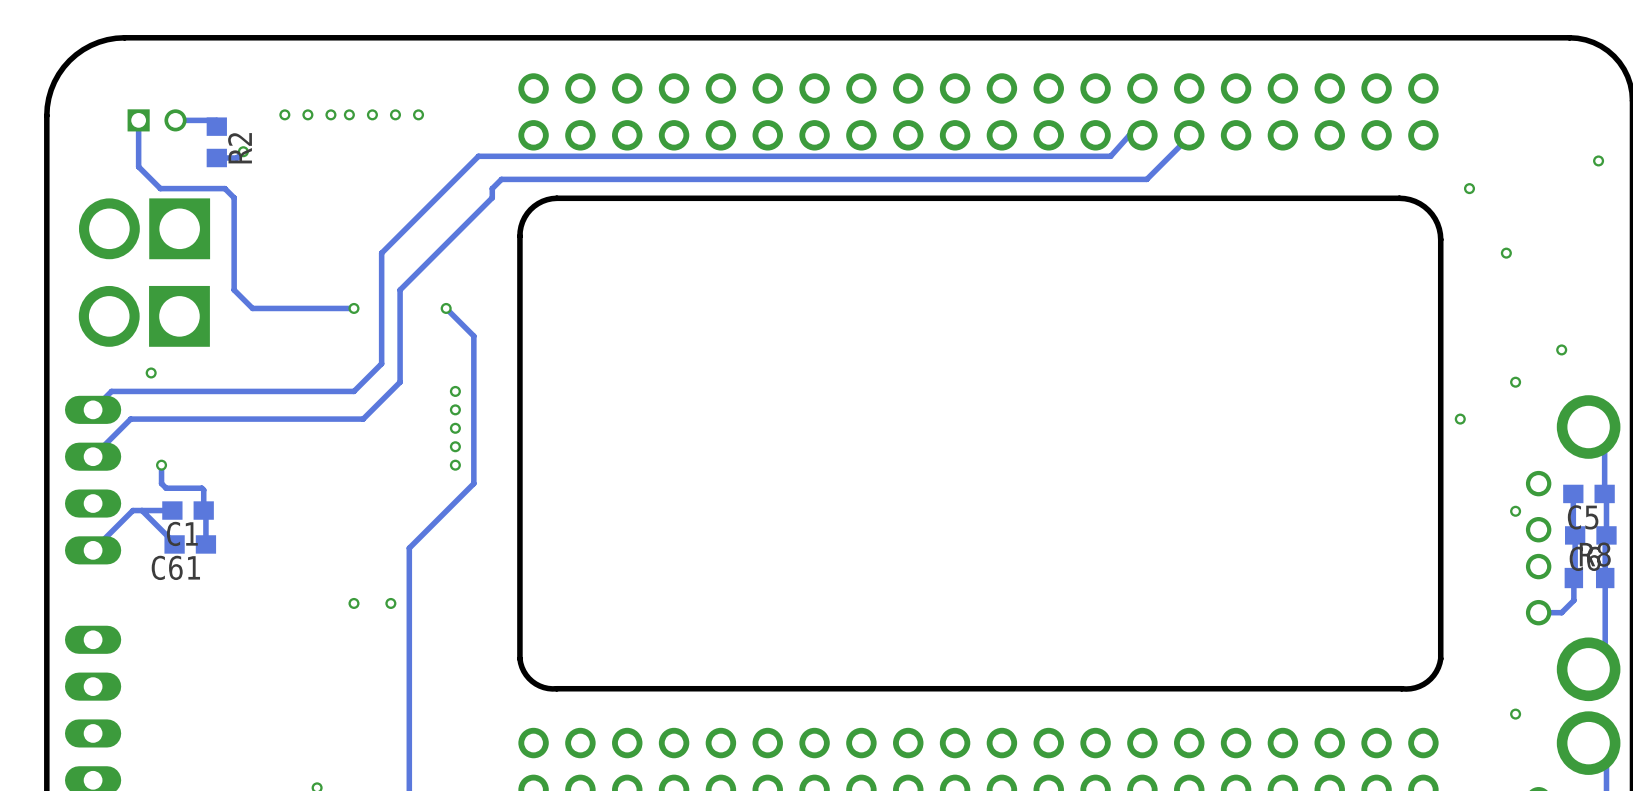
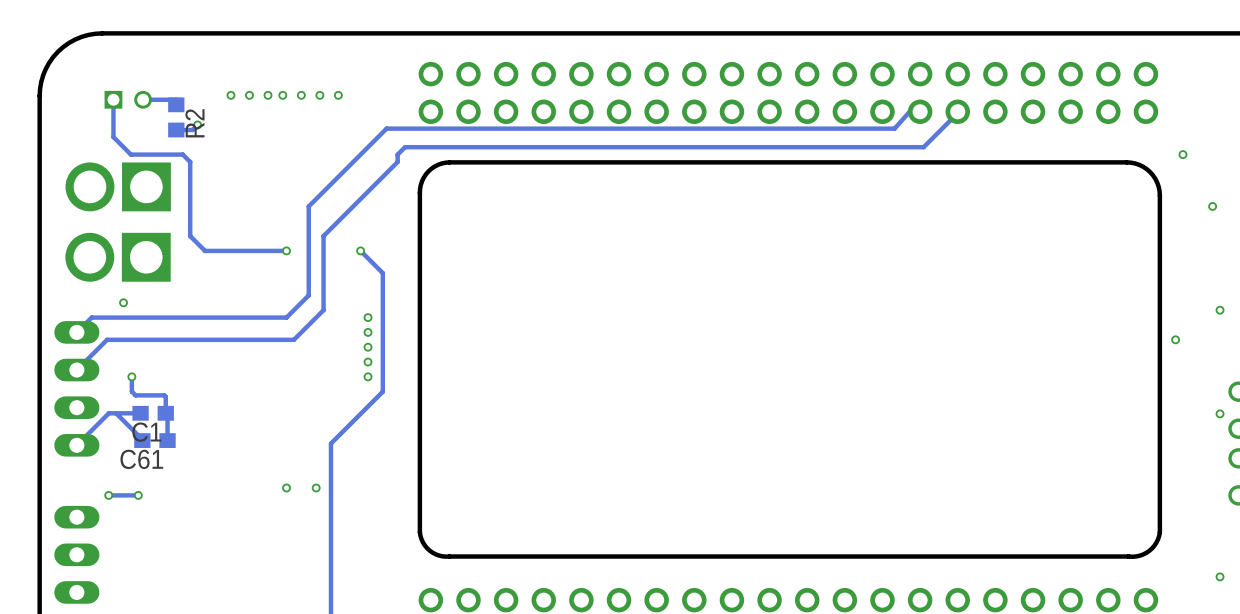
via: none -> (108, 495)
track: none -> (138, 495) (108, 495)
via: none -> (138, 495)

